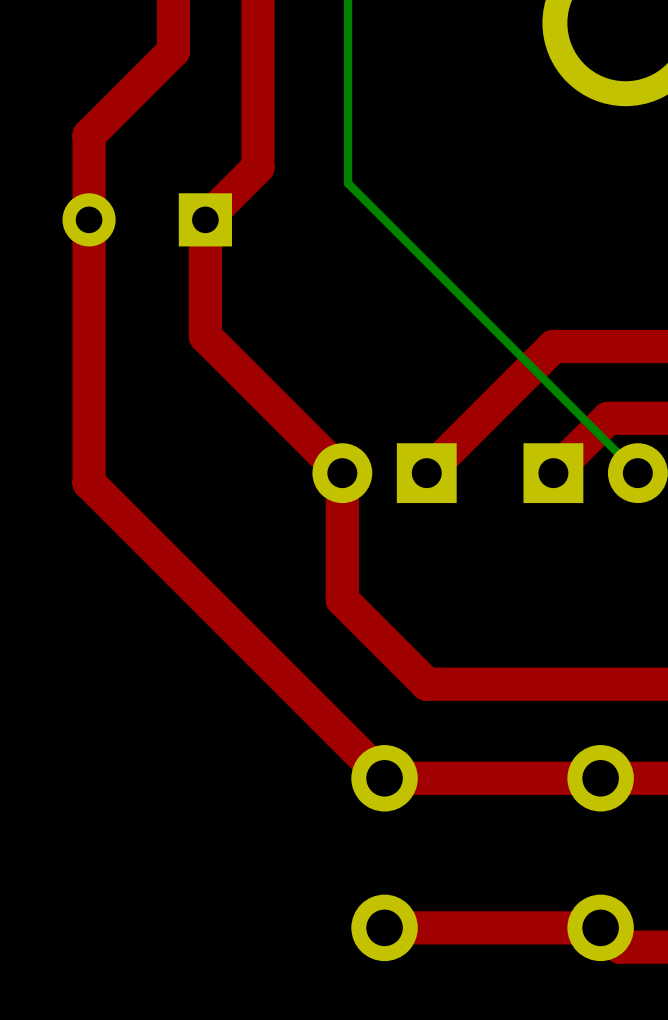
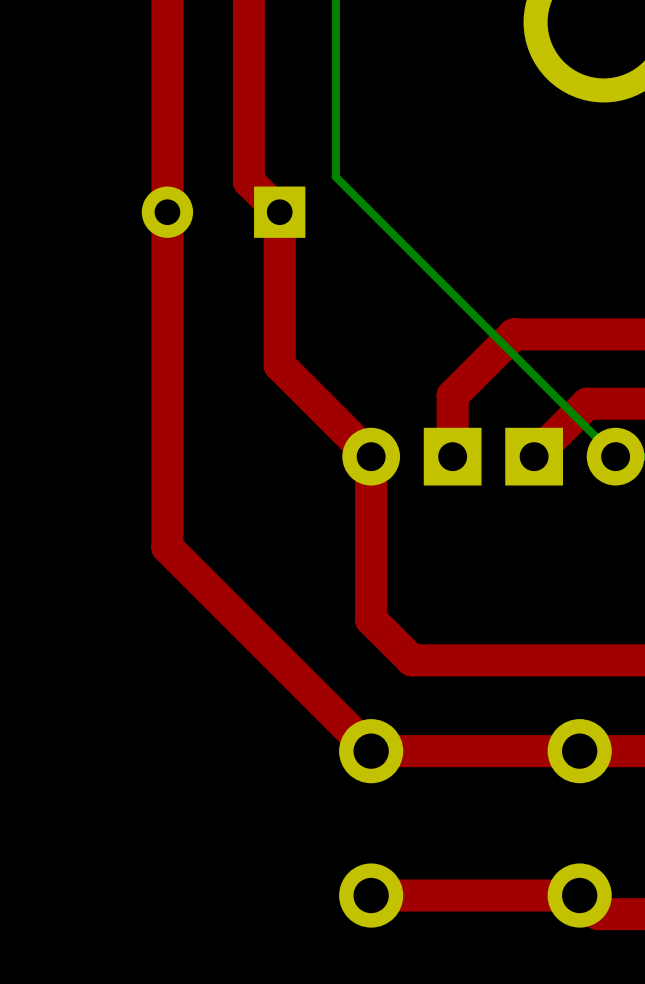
top track: (173, 51) (89, 135) (89, 482) (173, 567) -> (167, 49) (167, 547)
top track: (257, 167) (205, 219) (205, 336) (342, 473) (342, 599) (384, 642) -> (248, 161) (248, 181) (279, 212) (279, 365) (371, 456) (371, 619)
part position: (147, 219) -> (223, 212)
top track: (553, 346) (426, 473) -> (534, 334) (513, 334) (452, 395) (452, 456)
part position: (384, 473) -> (411, 456)

